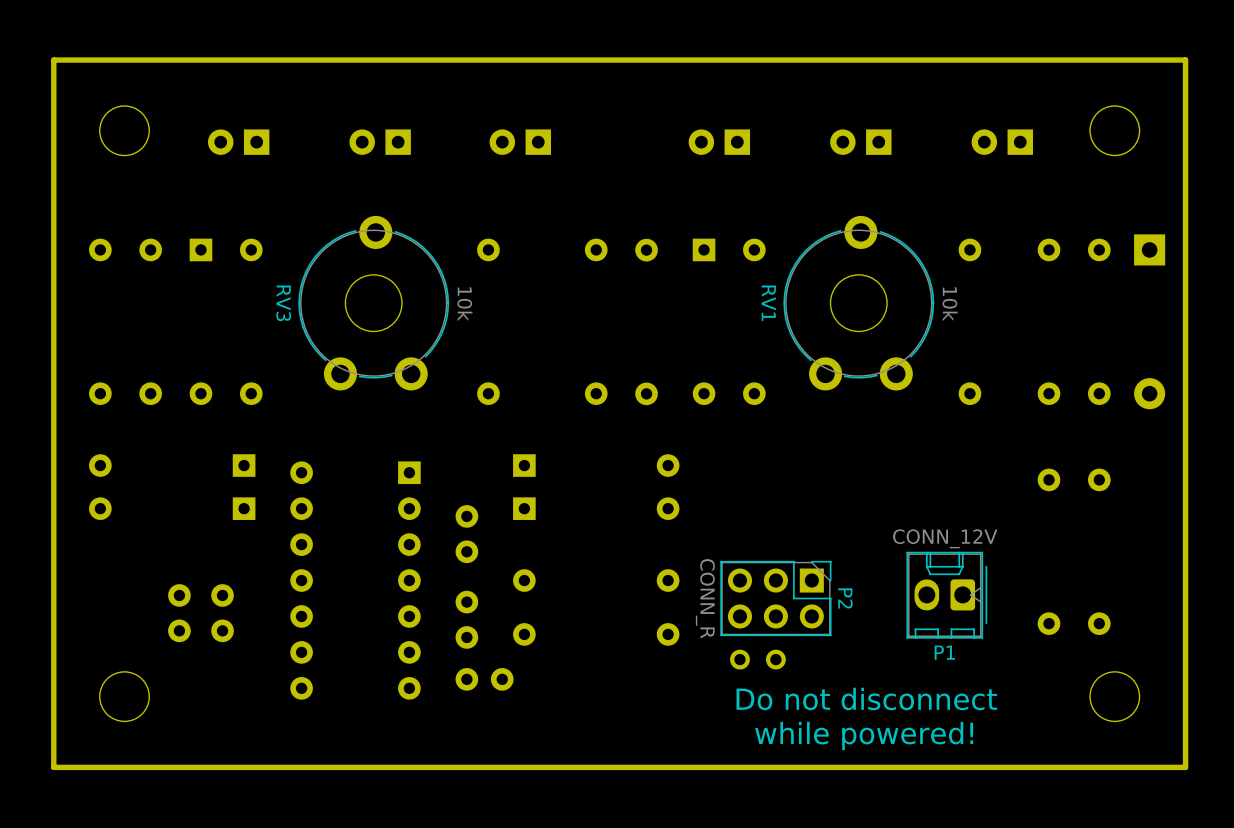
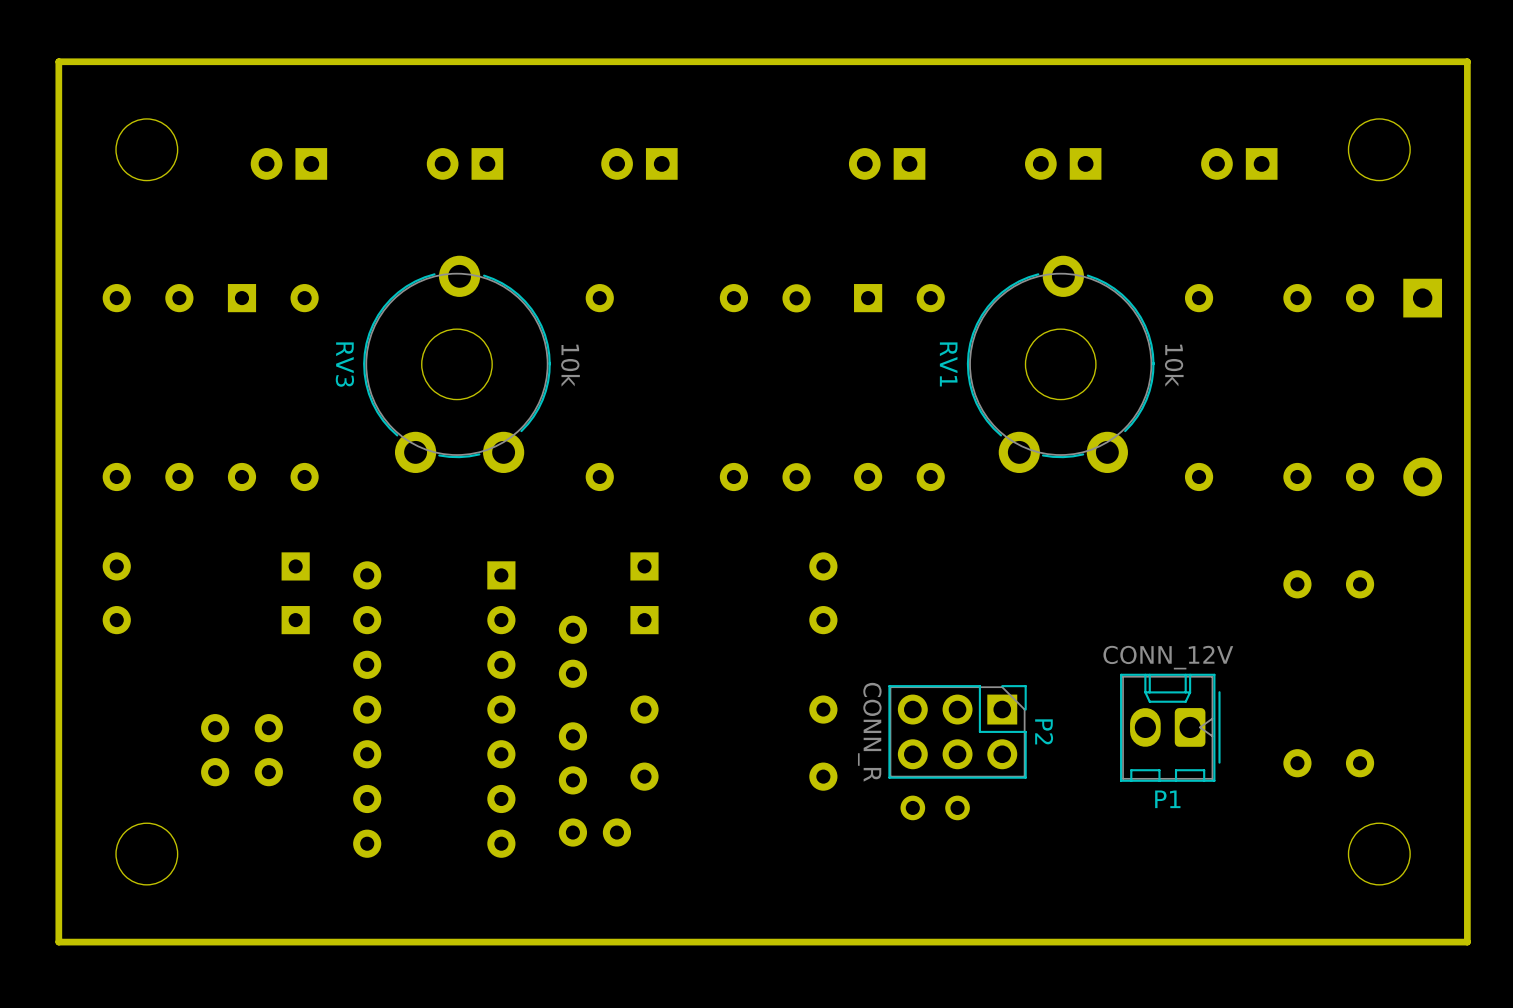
text: Do not disconnect (866, 698) -> none
text: while powered! (864, 735) -> none

